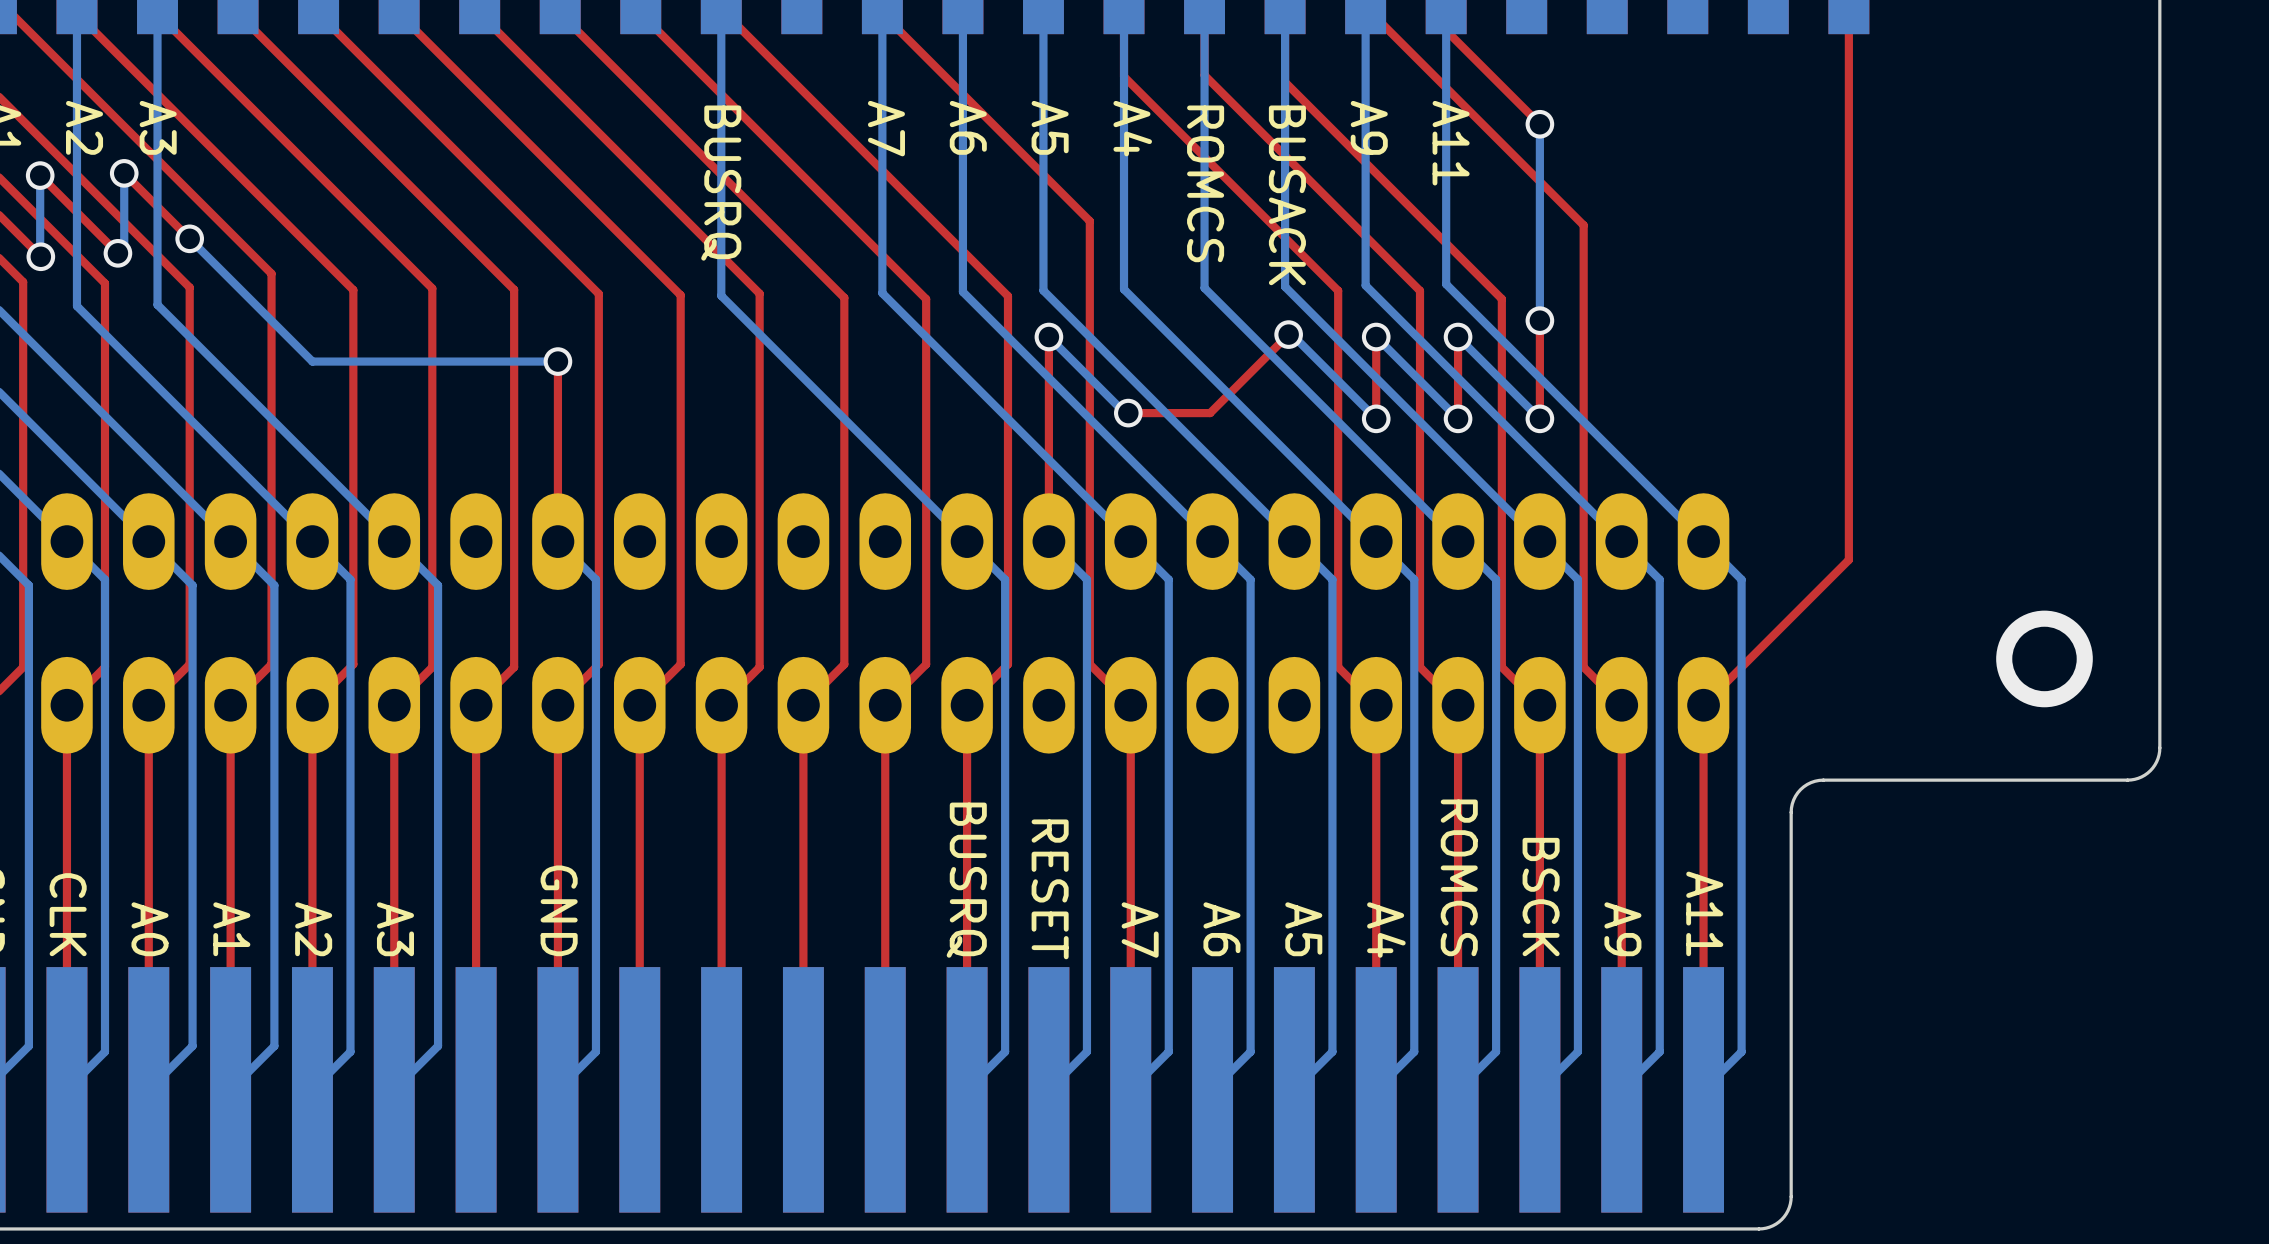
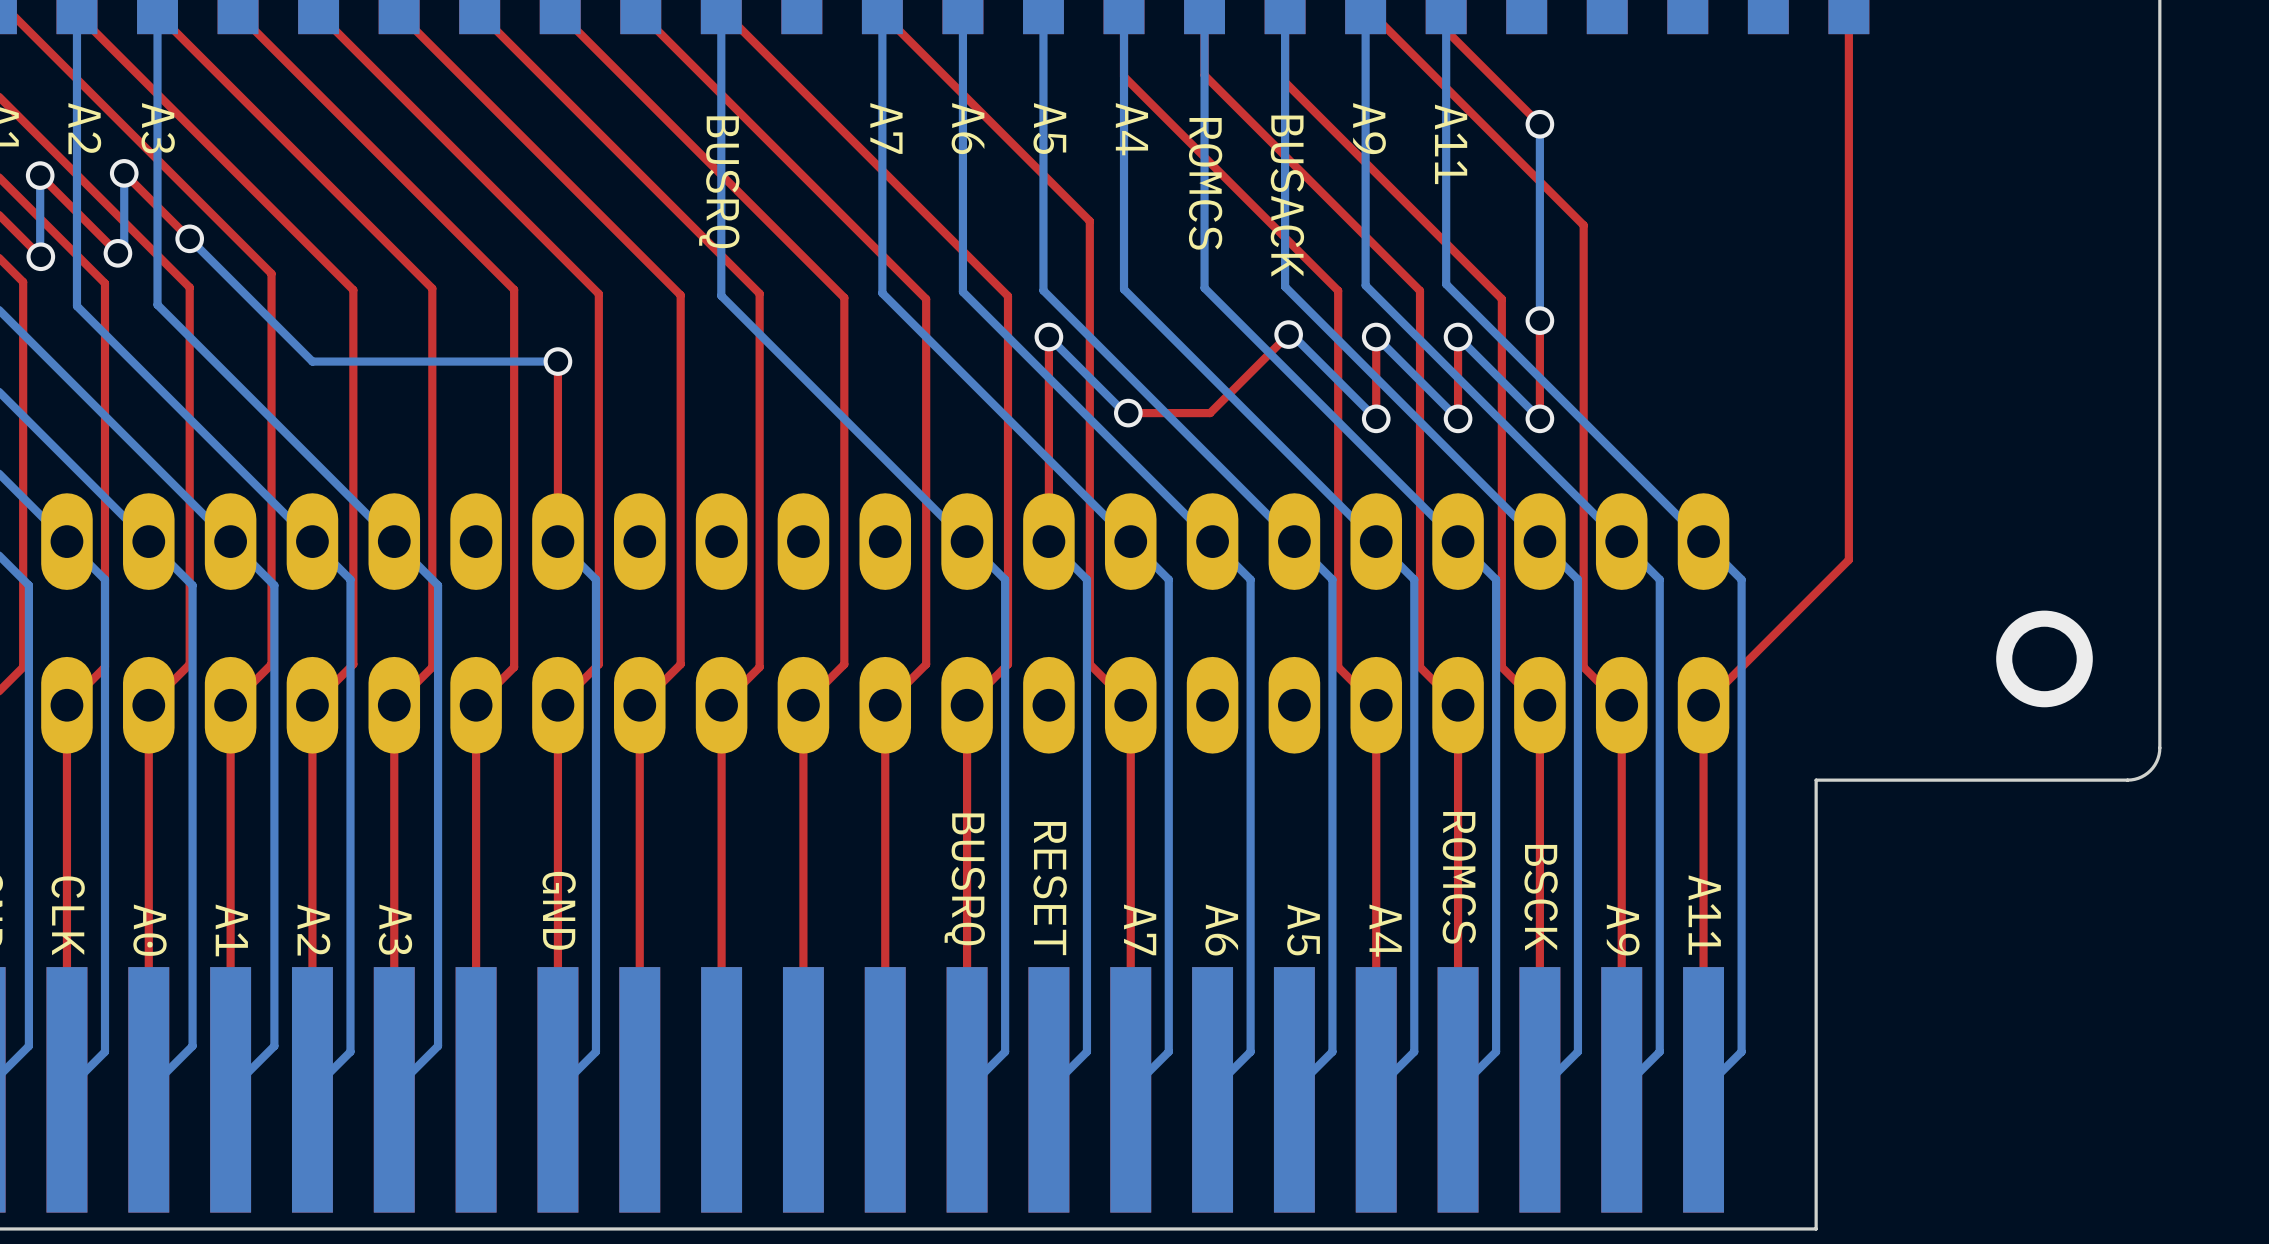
board edge: (1823, 780) (1815, 781) (1803, 786) (1795, 796) (1791, 808) (1790, 1200) (1786, 1213) (1779, 1221) (1769, 1227) (1758, 1228) -> (1823, 780) (1816, 780) (1816, 1228) (1758, 1228)

